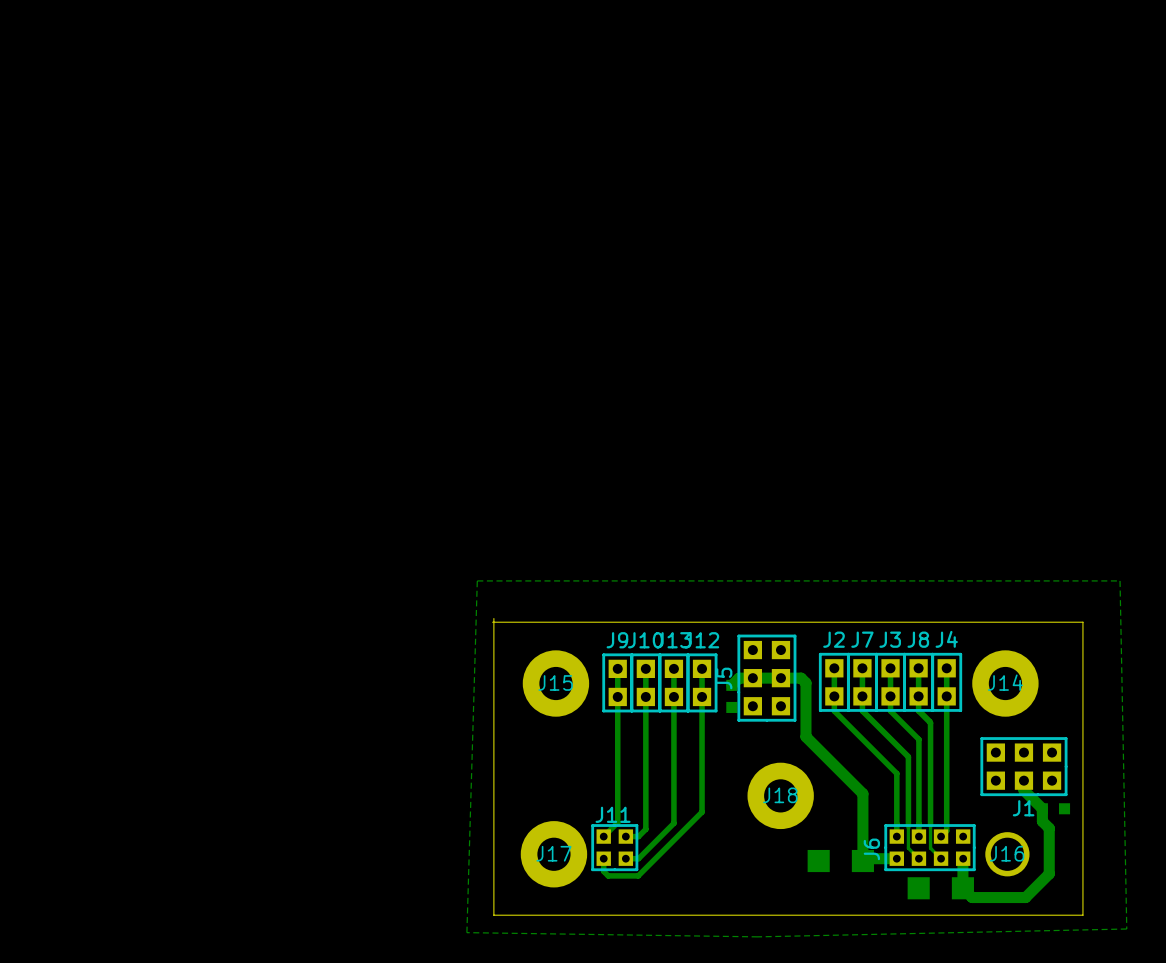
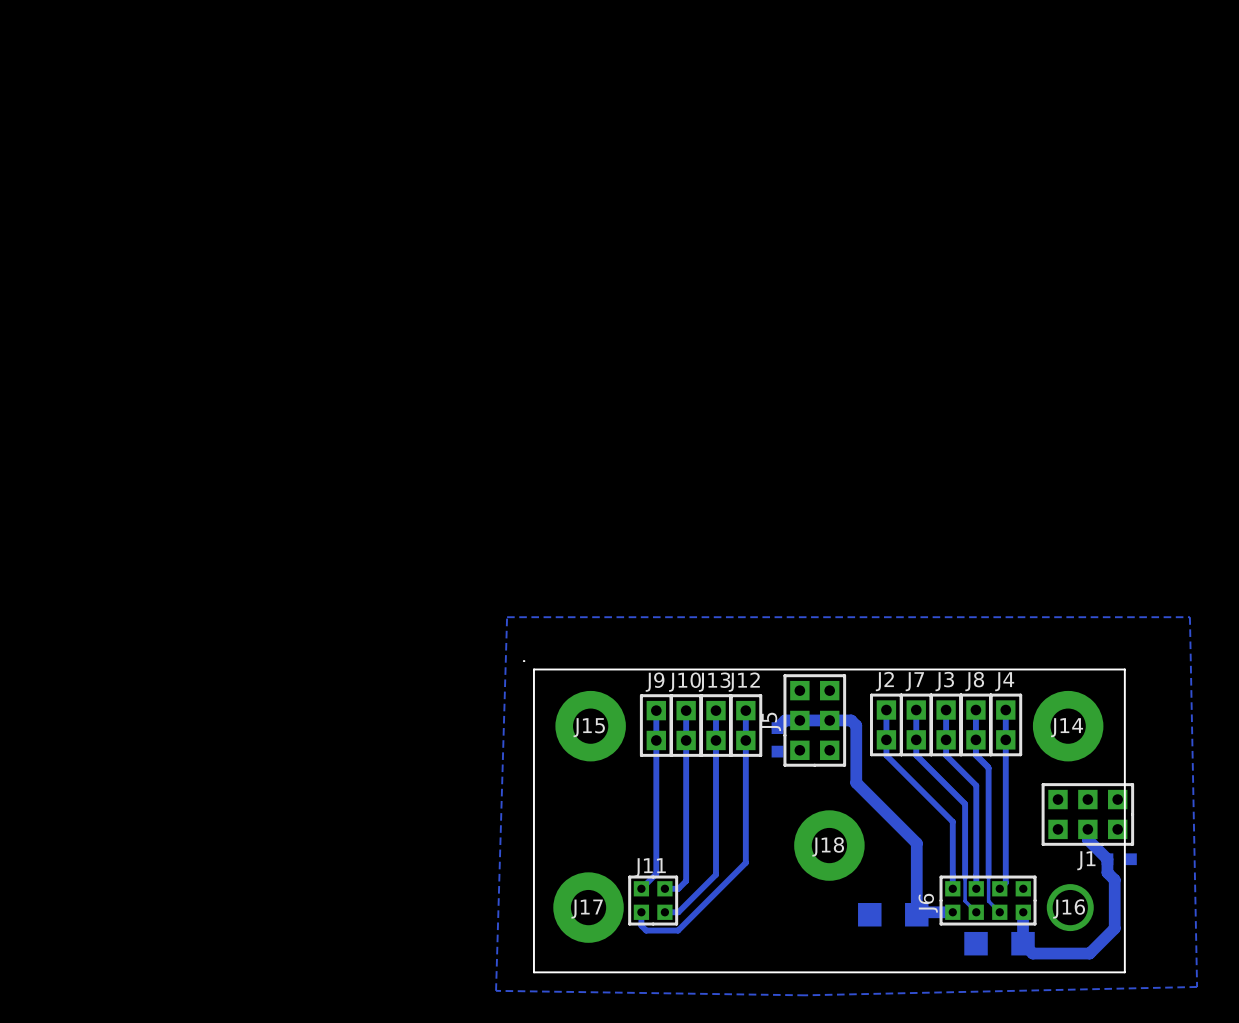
board edge: (493, 618) (493, 915) (502, 915) -> none
board edge: (493, 622) (1082, 622) (1082, 915) (1058, 915) -> (533, 972) (533, 669) (1124, 669) (1124, 972)

